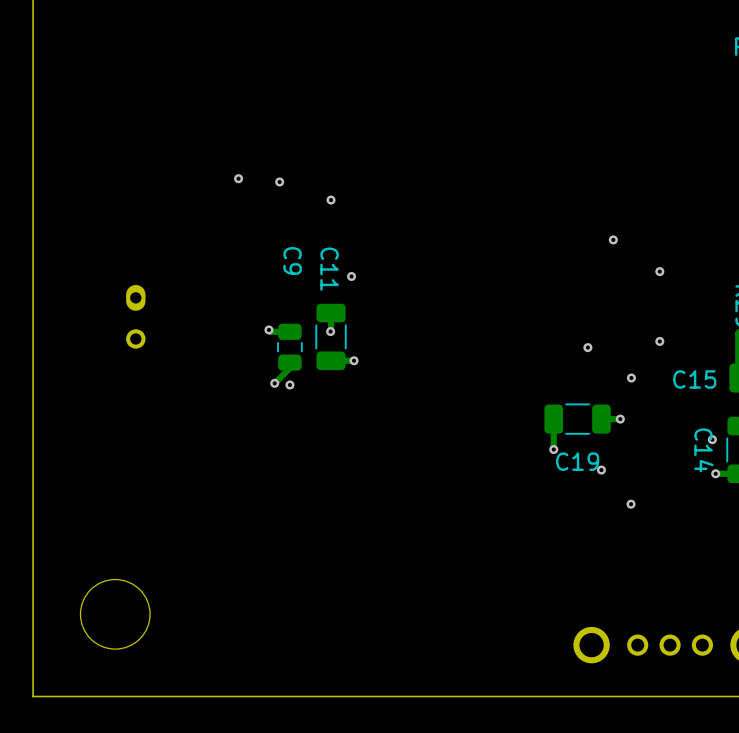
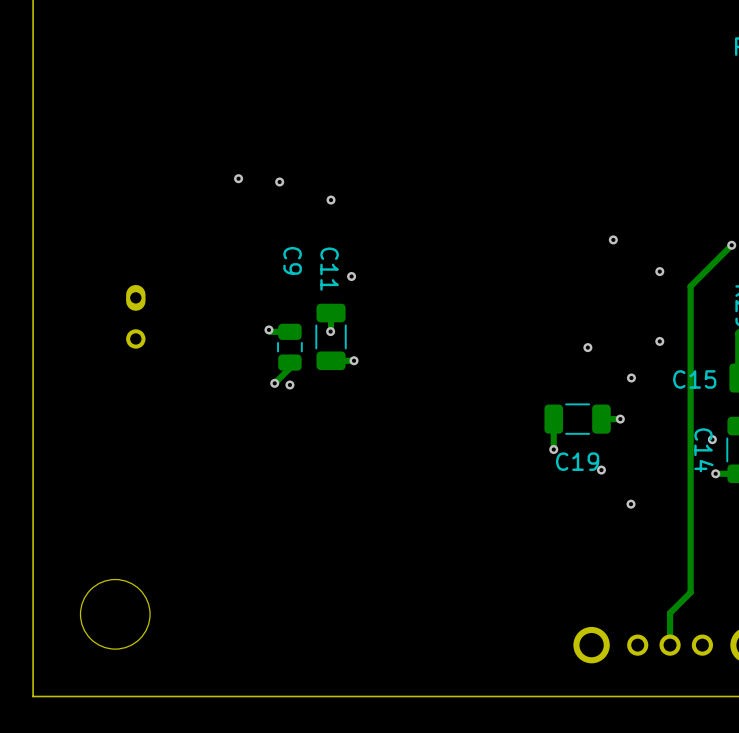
track: none -> (731, 245) (690, 286) (690, 592) (670, 613) (670, 647)
via: none -> (731, 245)

